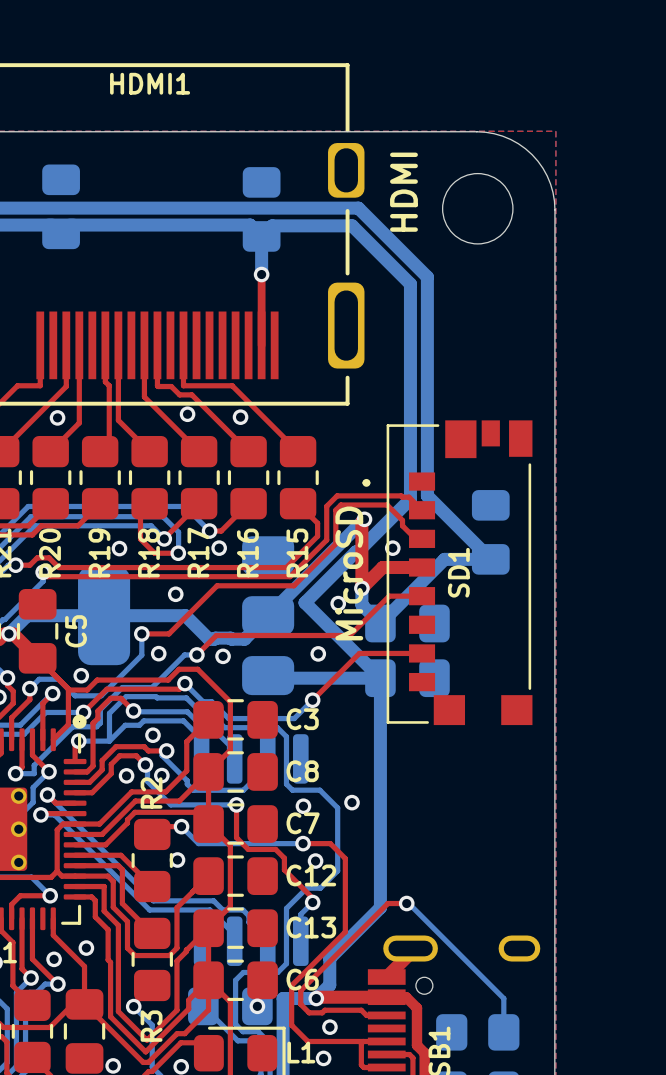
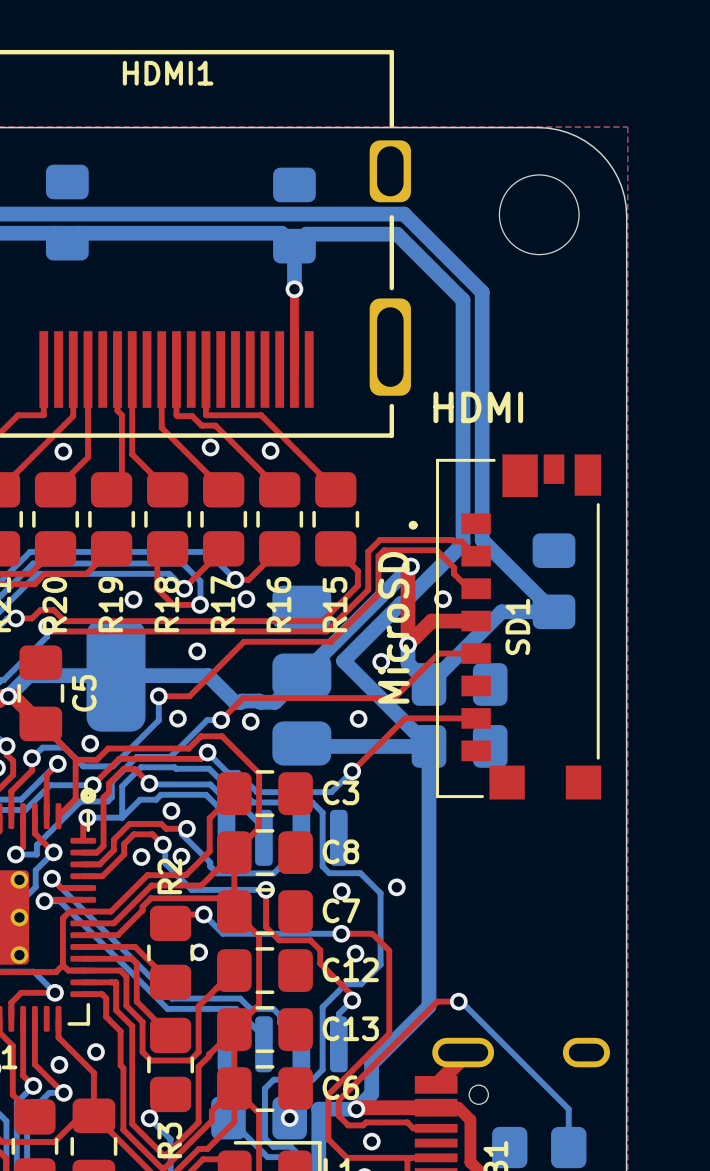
text rotation: 0° (403, 192) -> 90° clockwise (478, 407)
text position: HDMI (403, 192) -> HDMI (478, 407)

